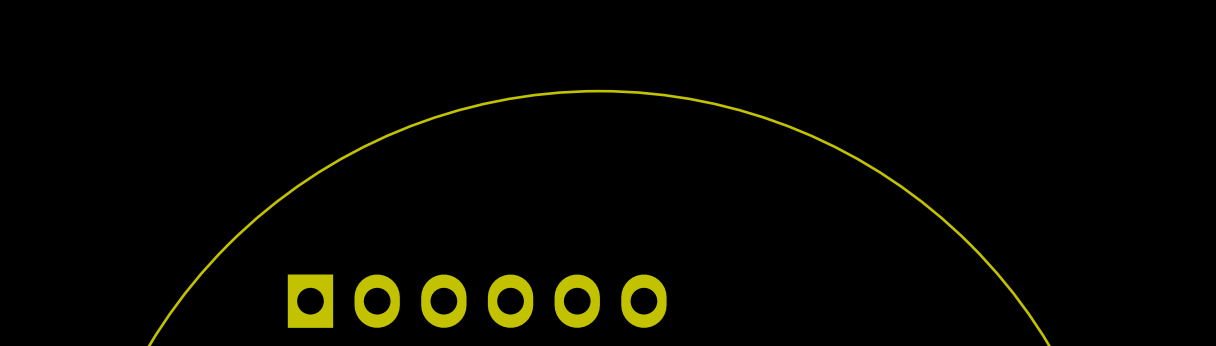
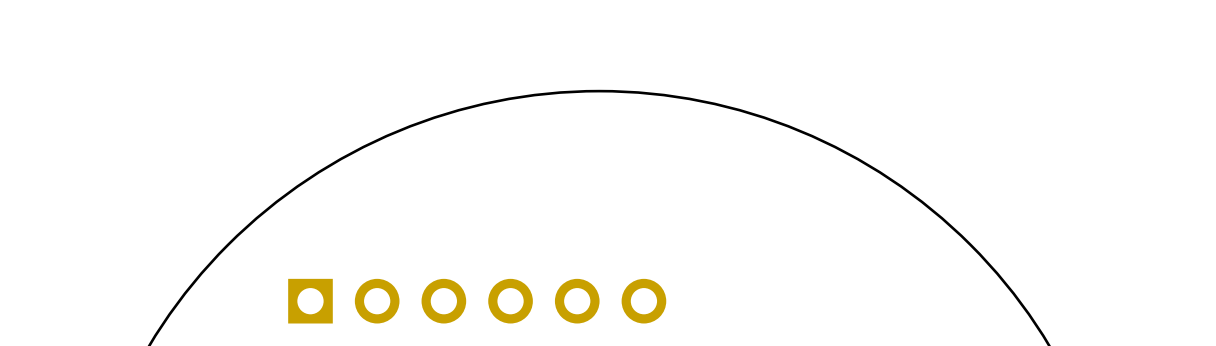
part footprint: [287, 274, 667, 328] -> [288, 278, 667, 324]

